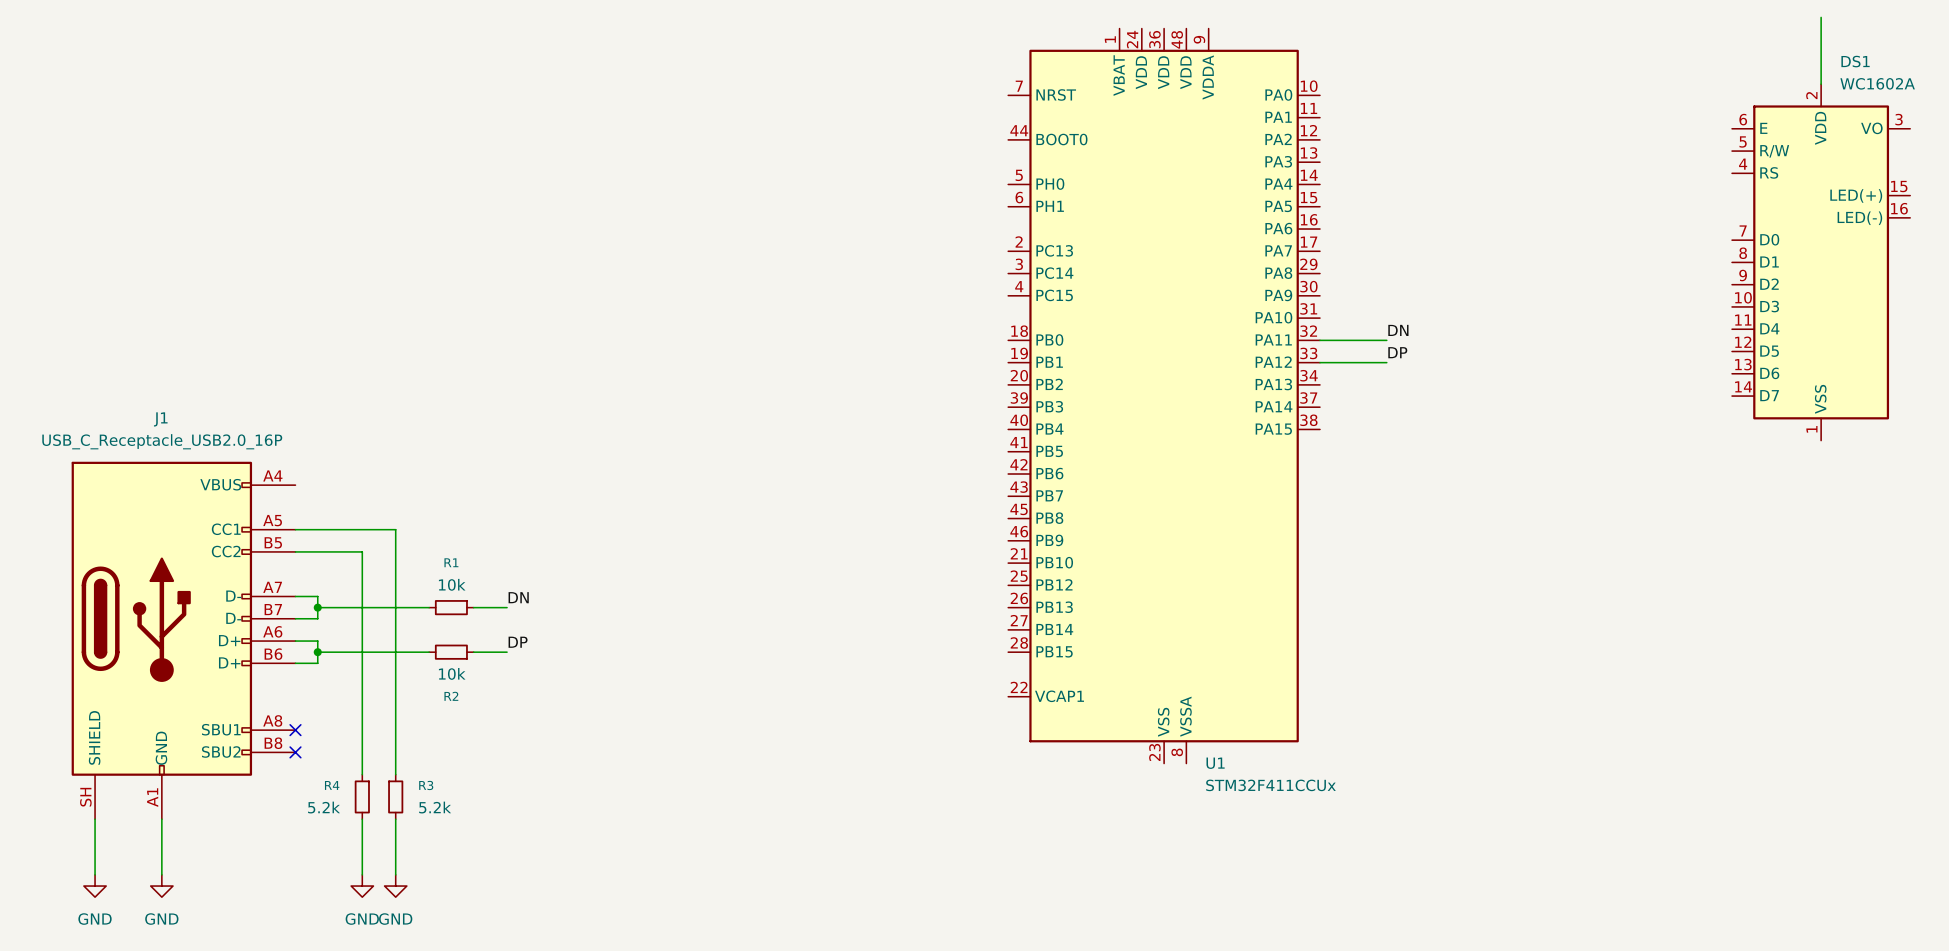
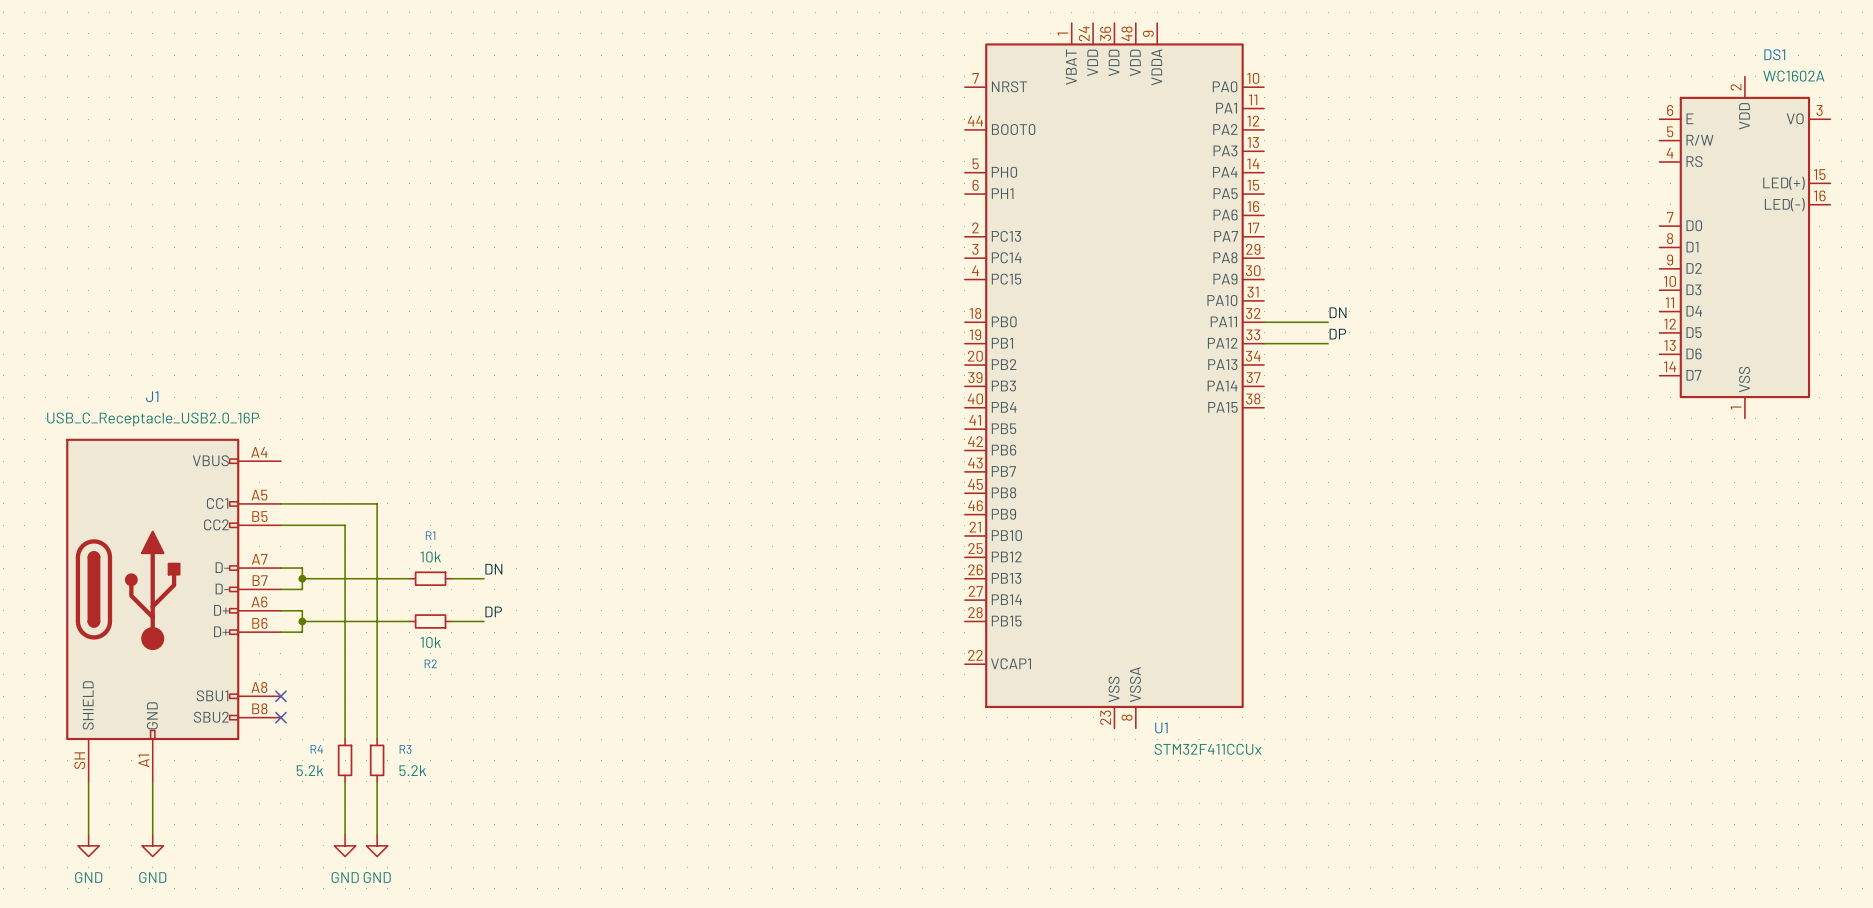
wire: (1821, 17) (1821, 84) -> none

